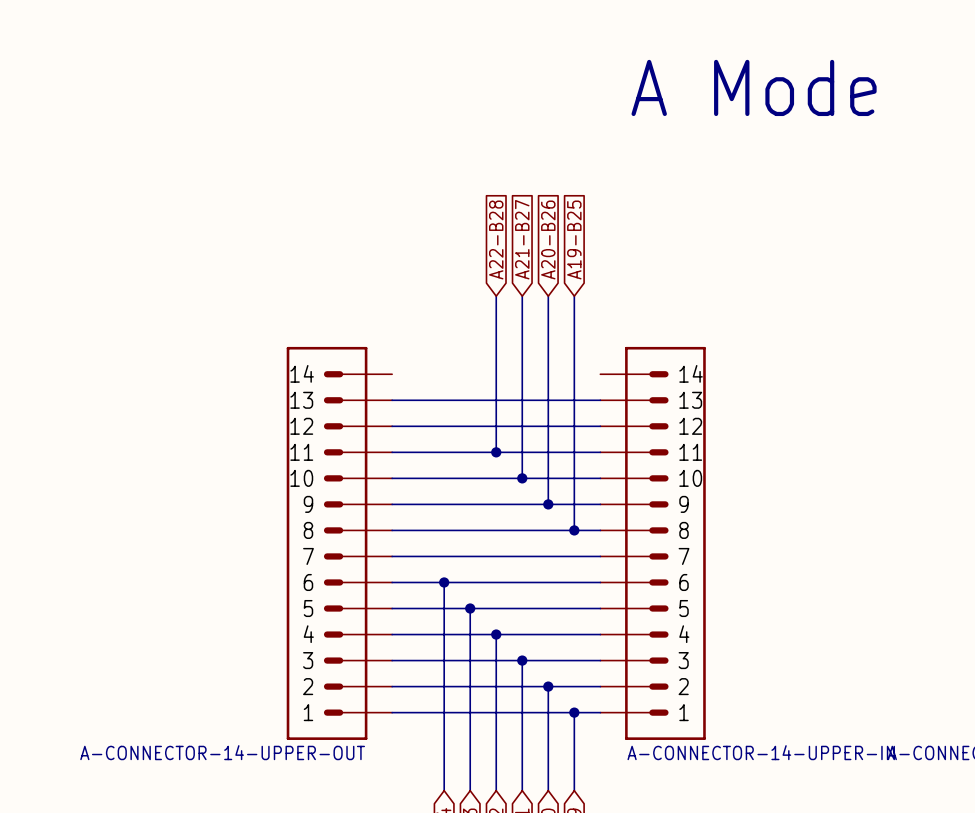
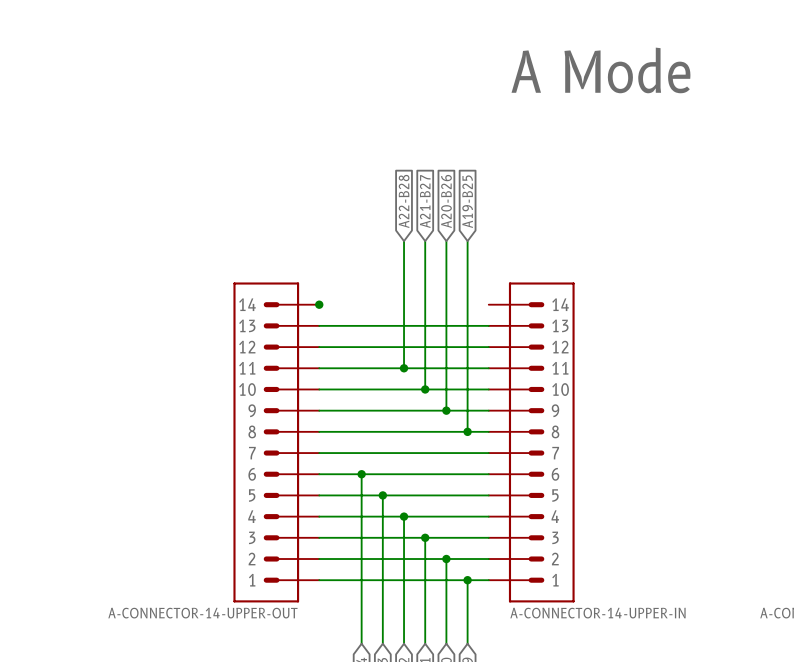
junction: none -> (319, 304)

